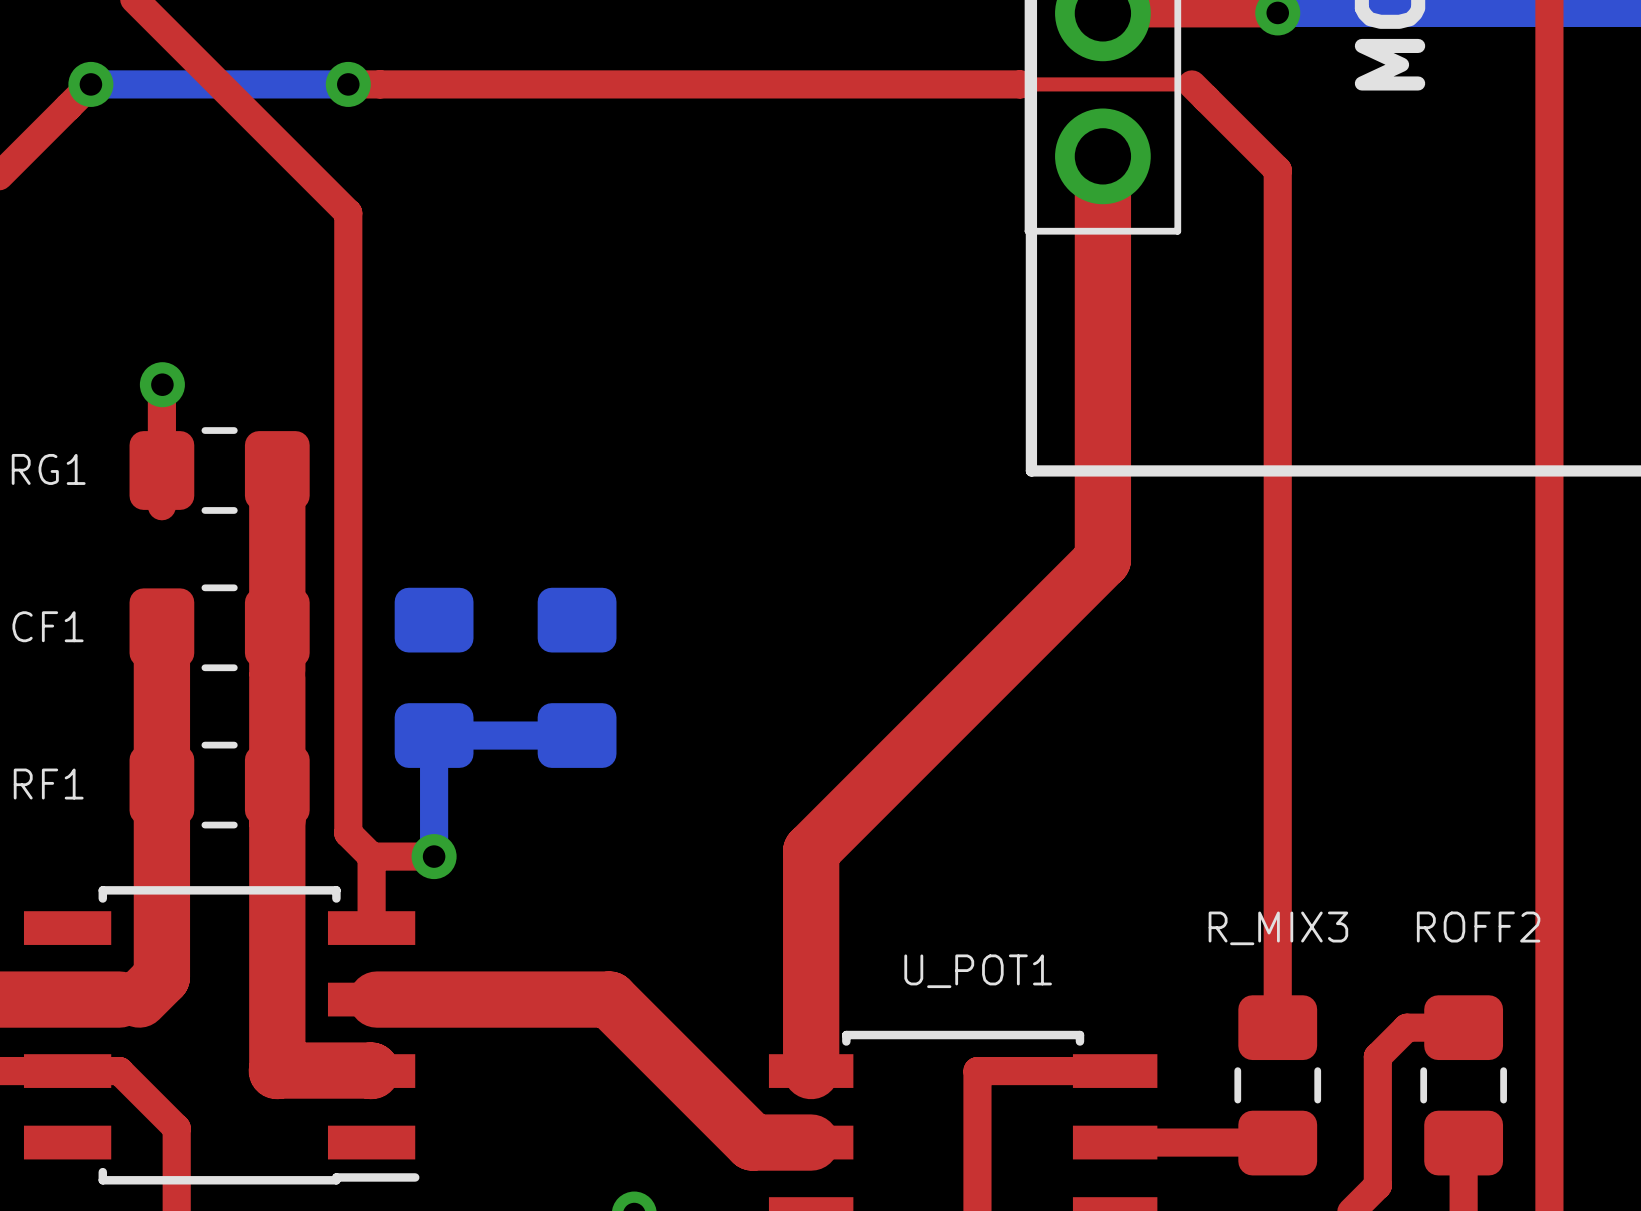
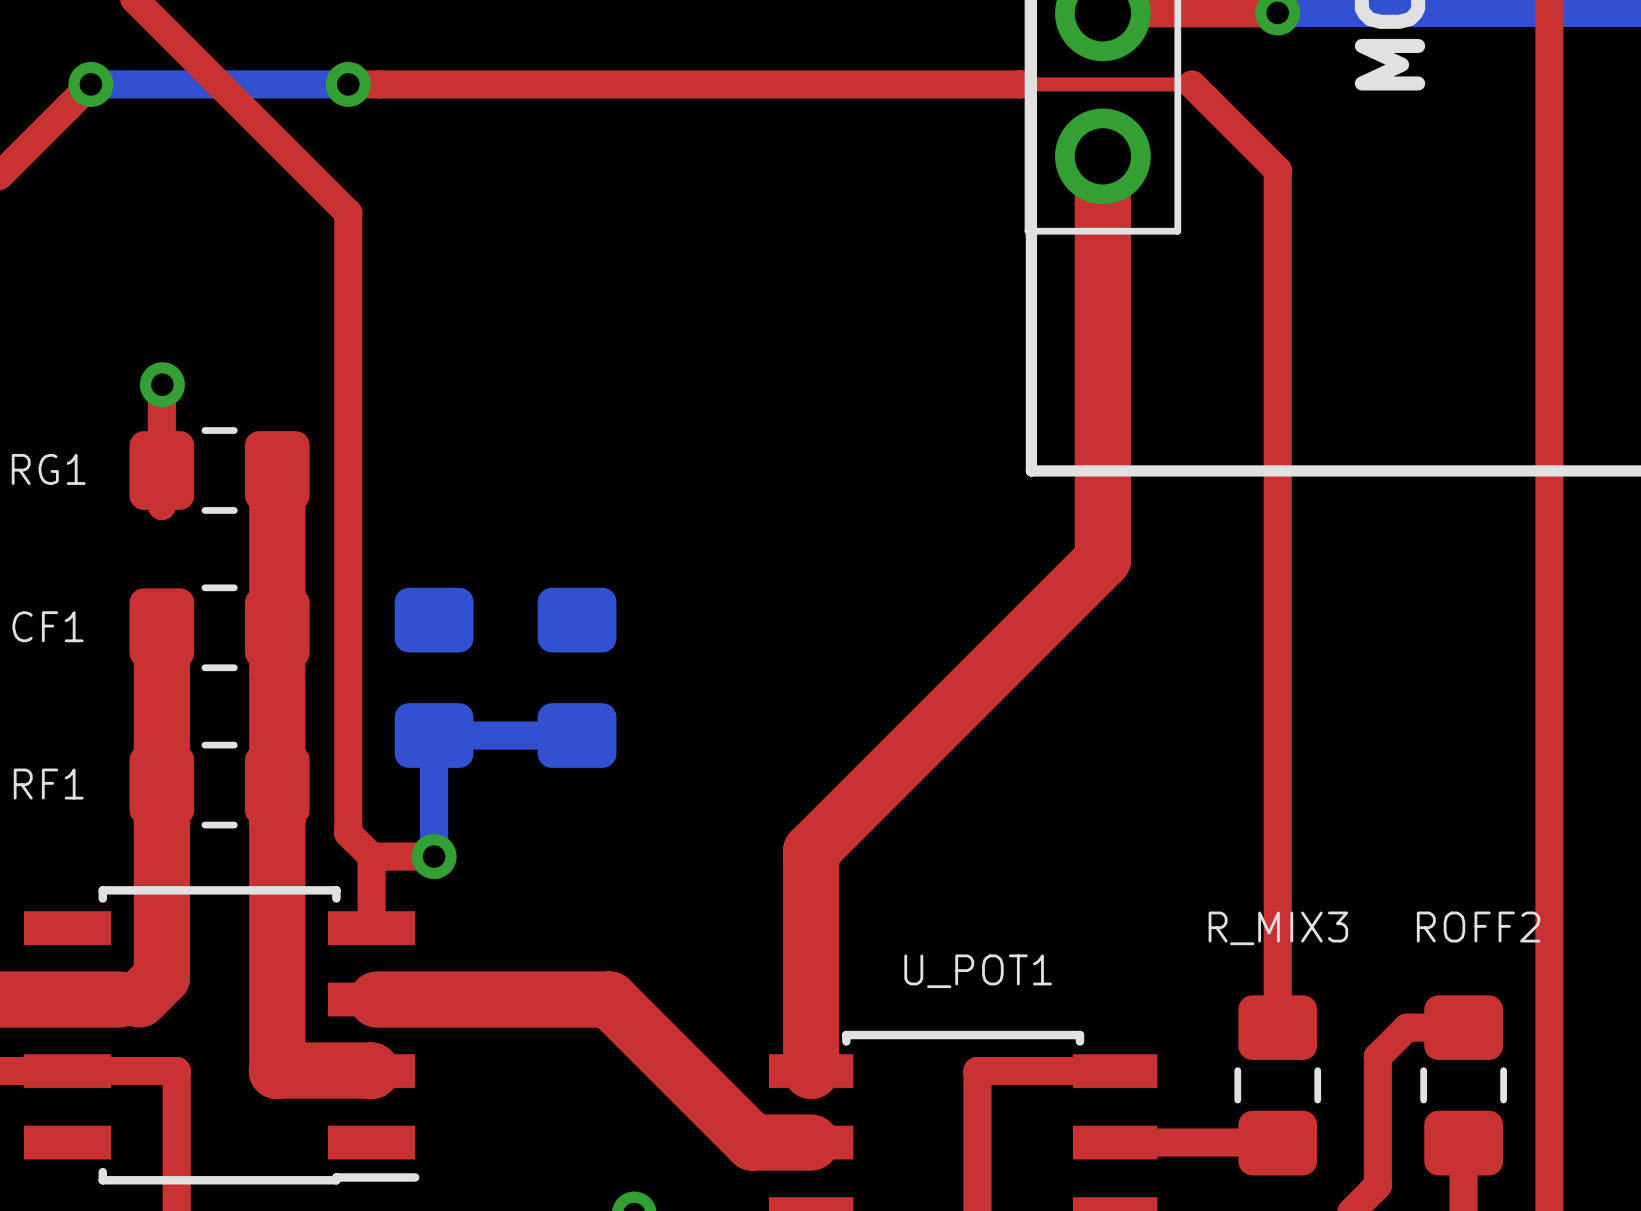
top track: (119, 1071) (176, 1128) -> (119, 1071) (176, 1071) (176, 1128)

